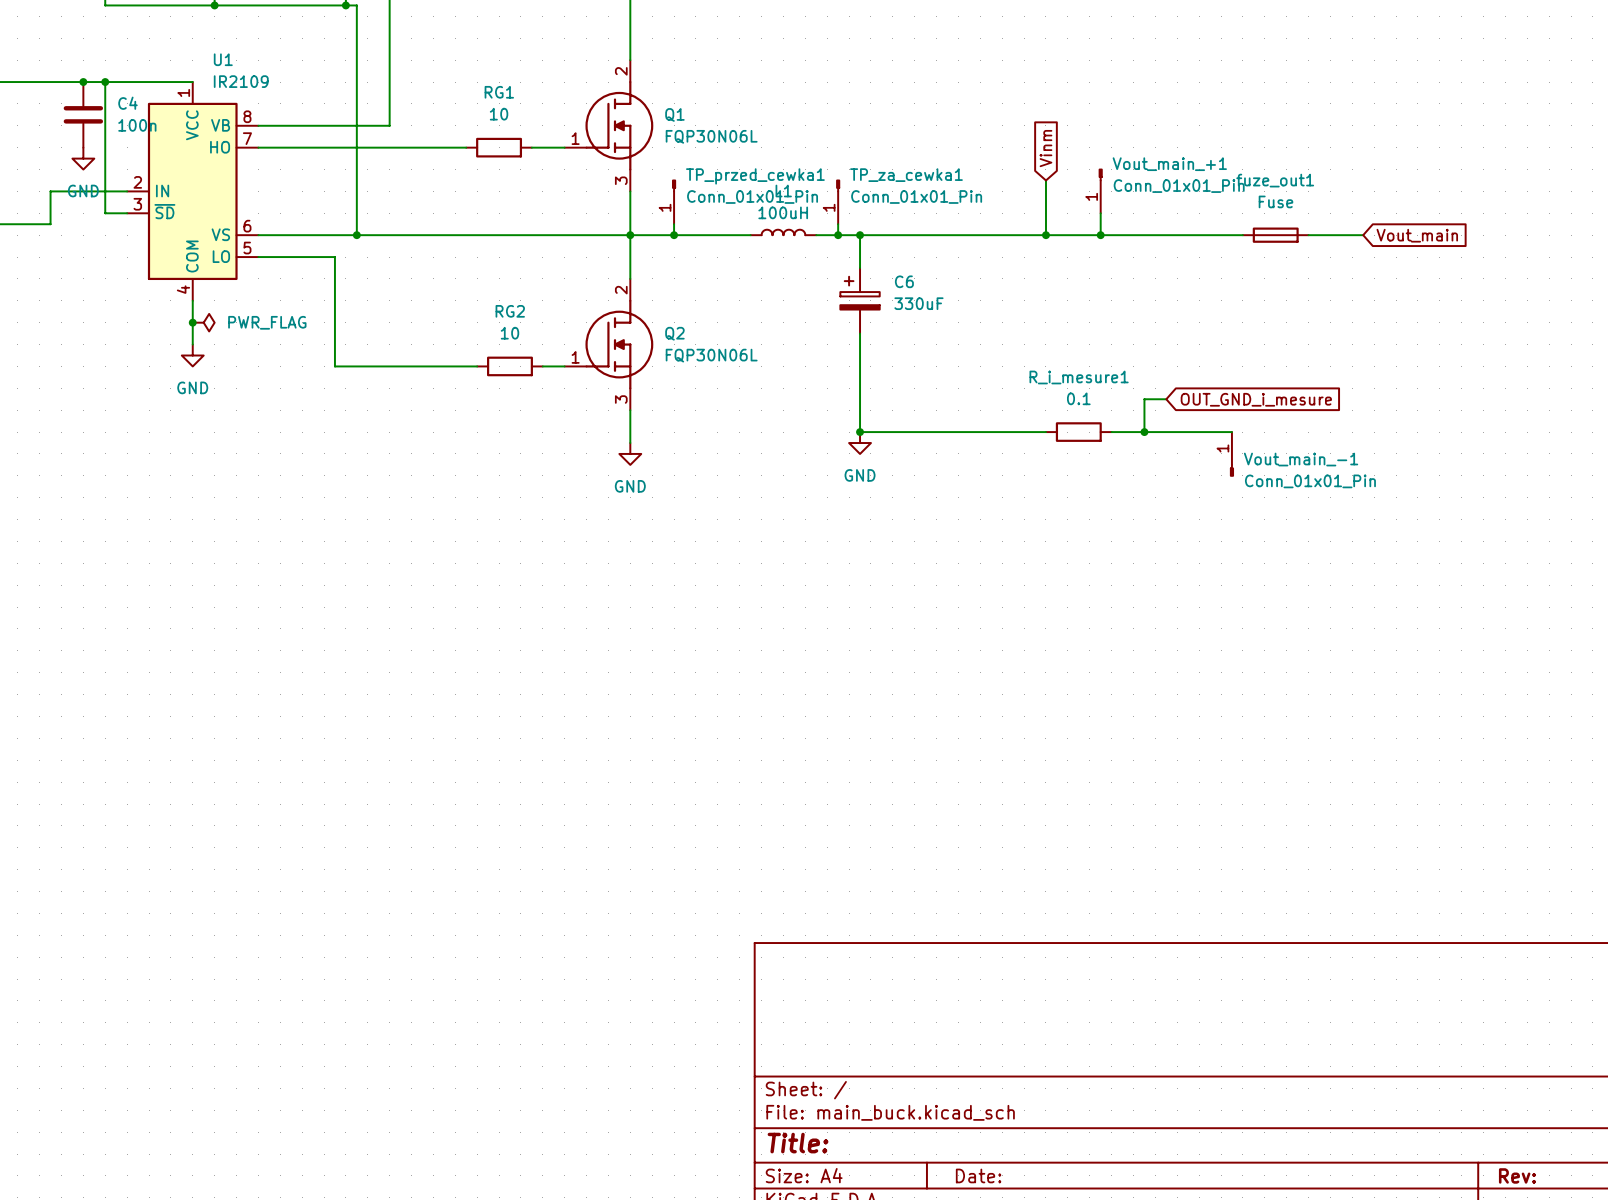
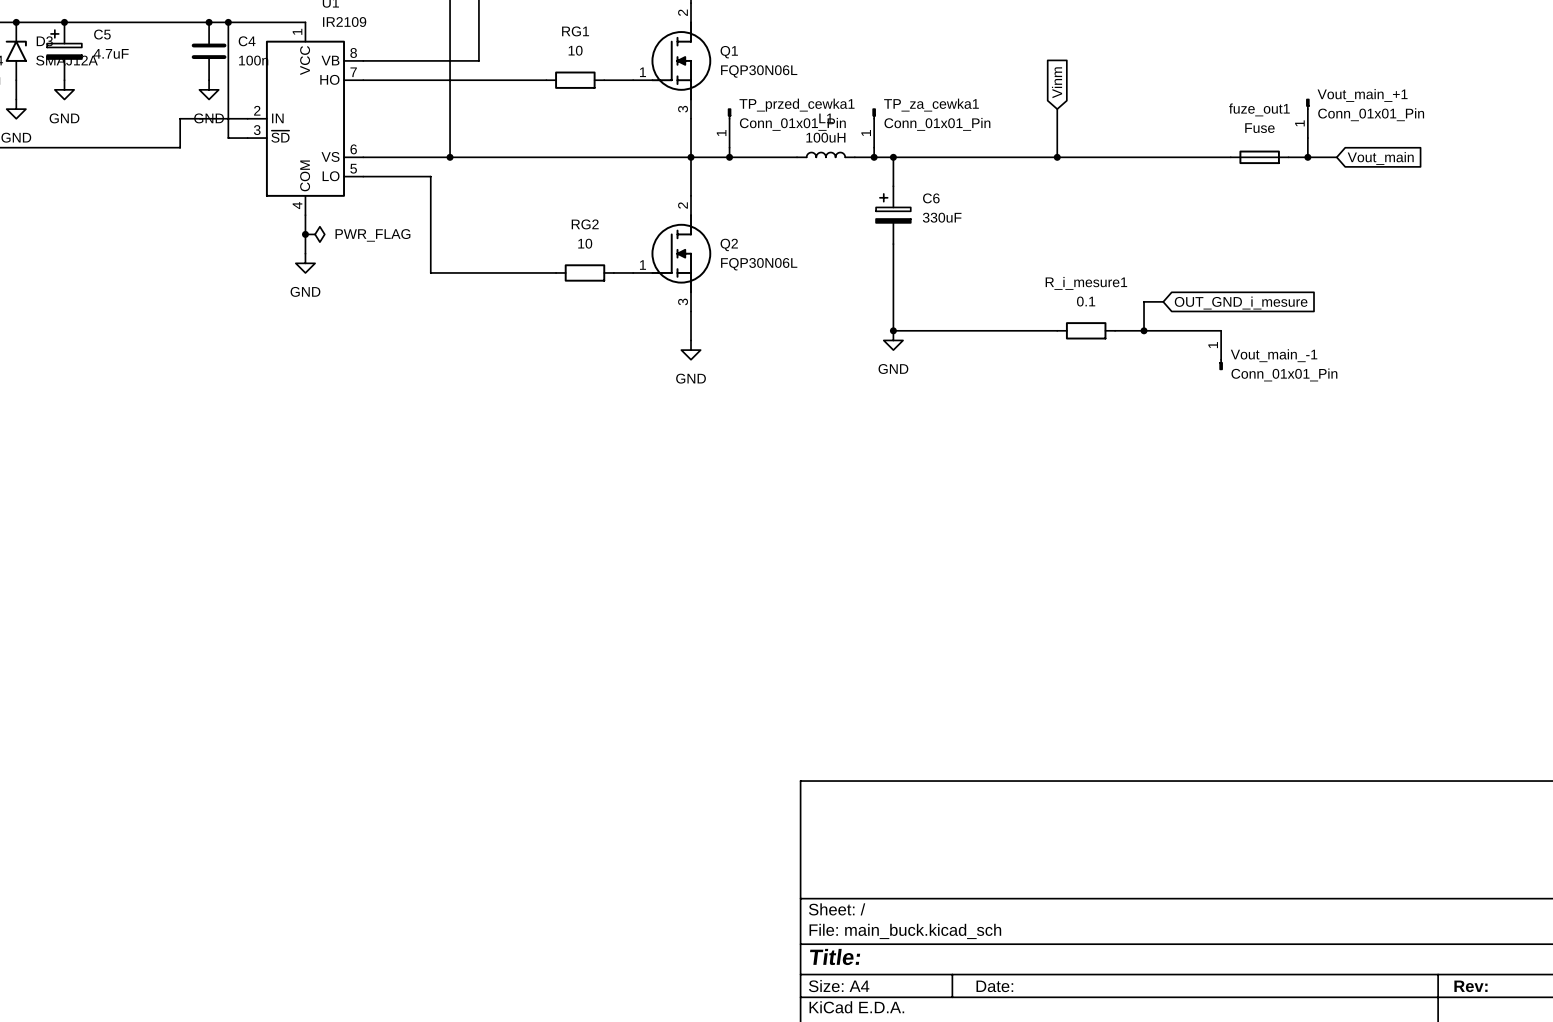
Vout_main_+1 position: (1100, 191) -> (1307, 118)
wire: (1100, 213) (1100, 235) -> none
wire: none -> (1307, 138) (1307, 157)
junction: (1100, 235) -> none
junction: none -> (1307, 157)

